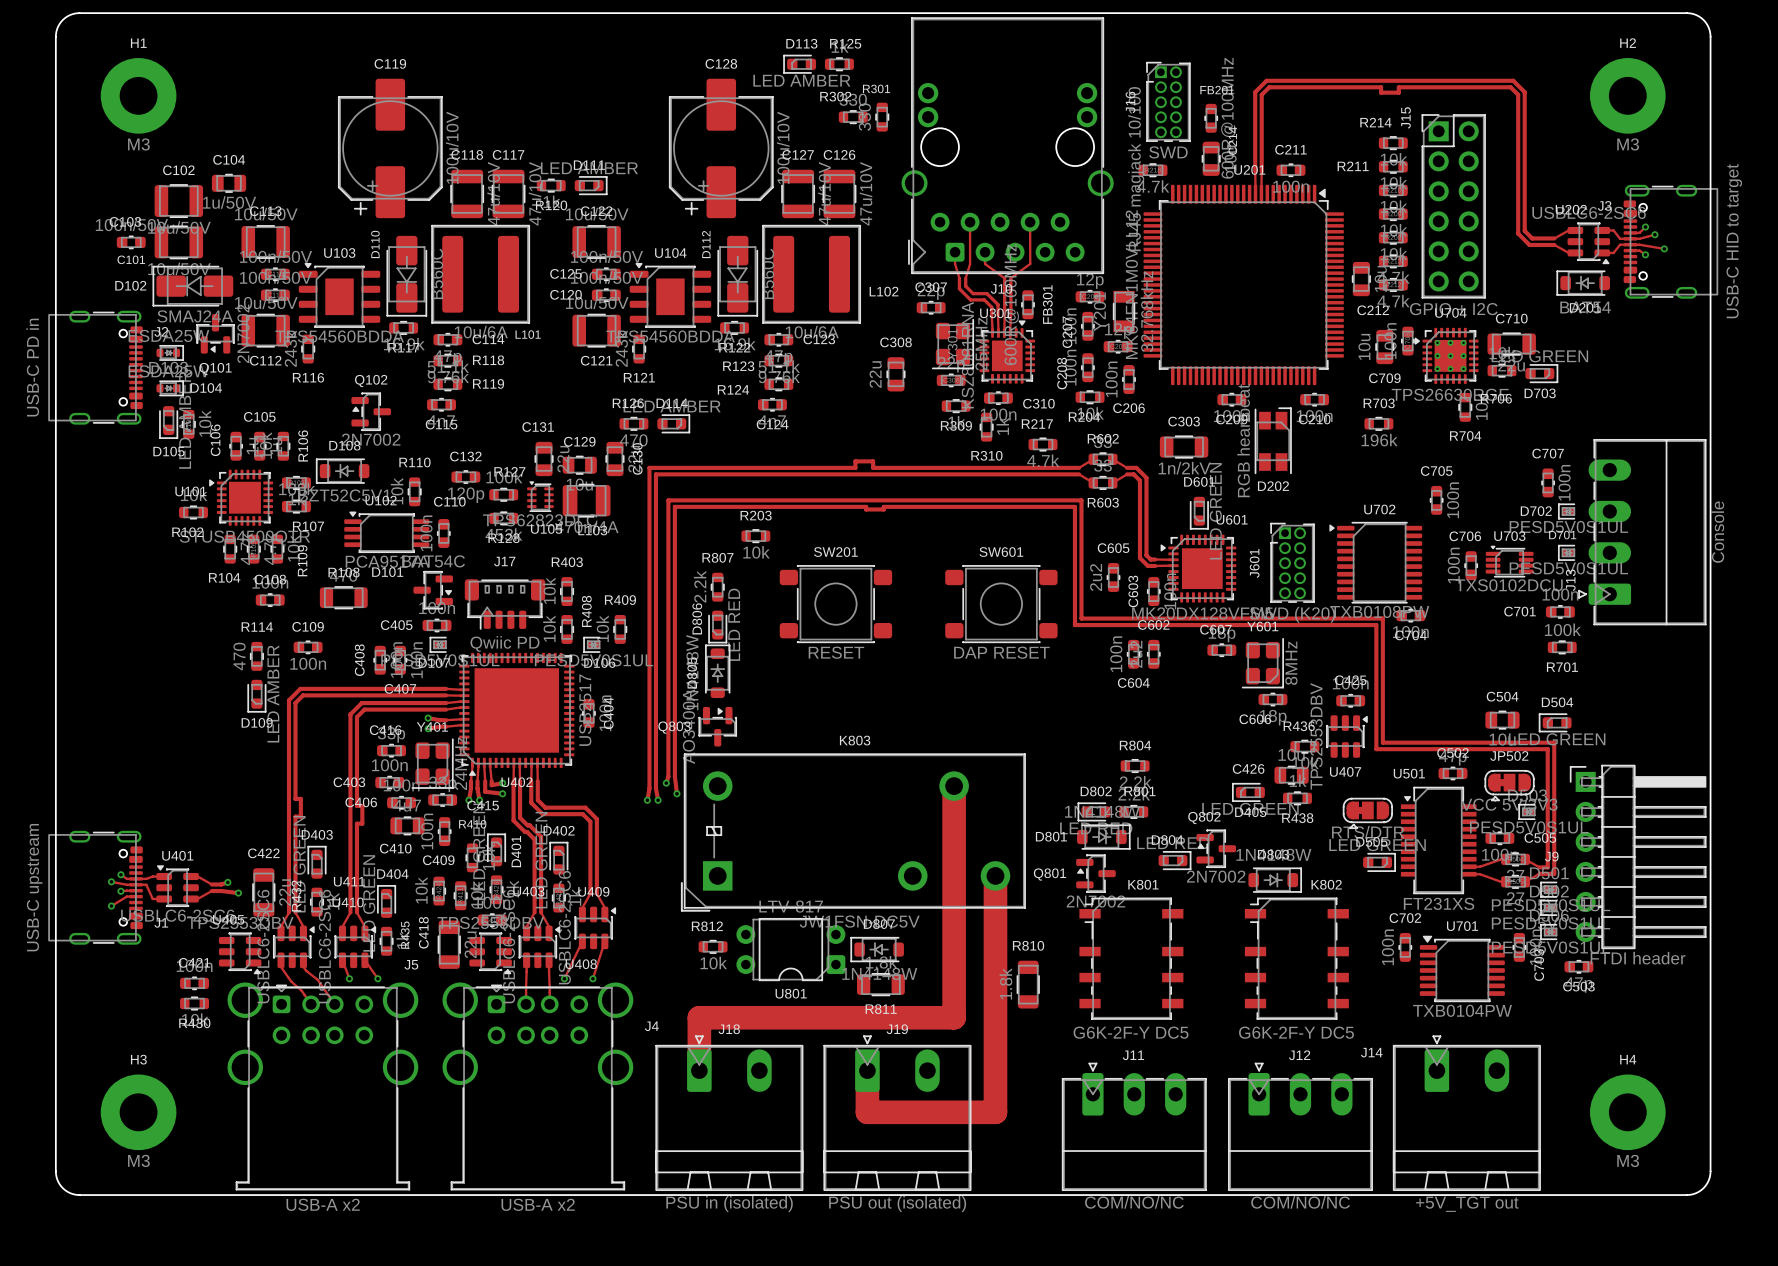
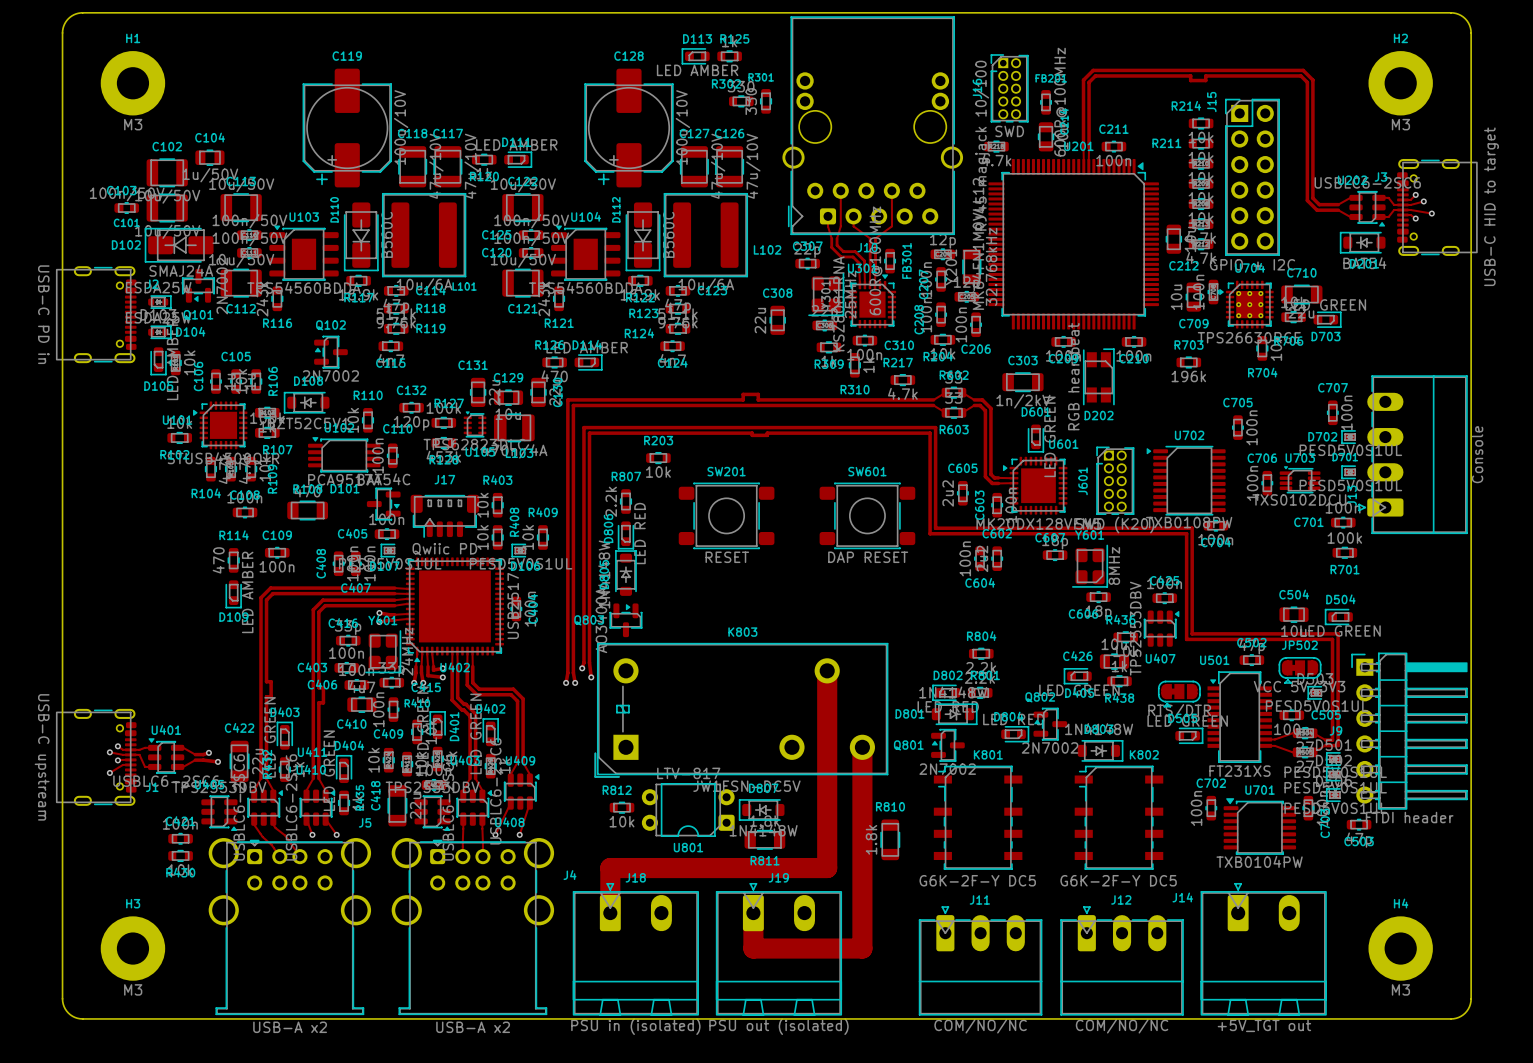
J2 value rotation: 0° (32, 367) -> 180° (43, 314)
J1 value rotation: 0° (34, 887) -> 180° (42, 757)

